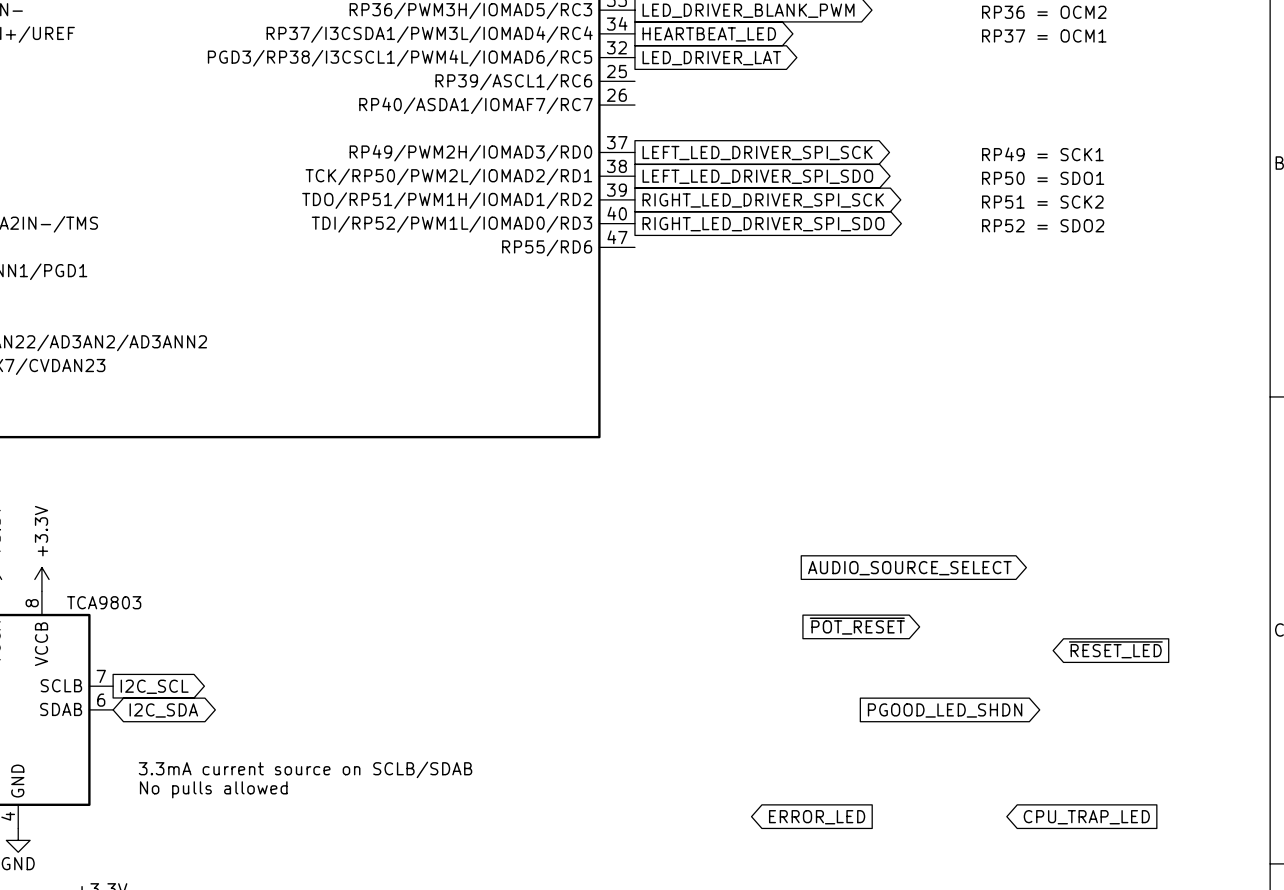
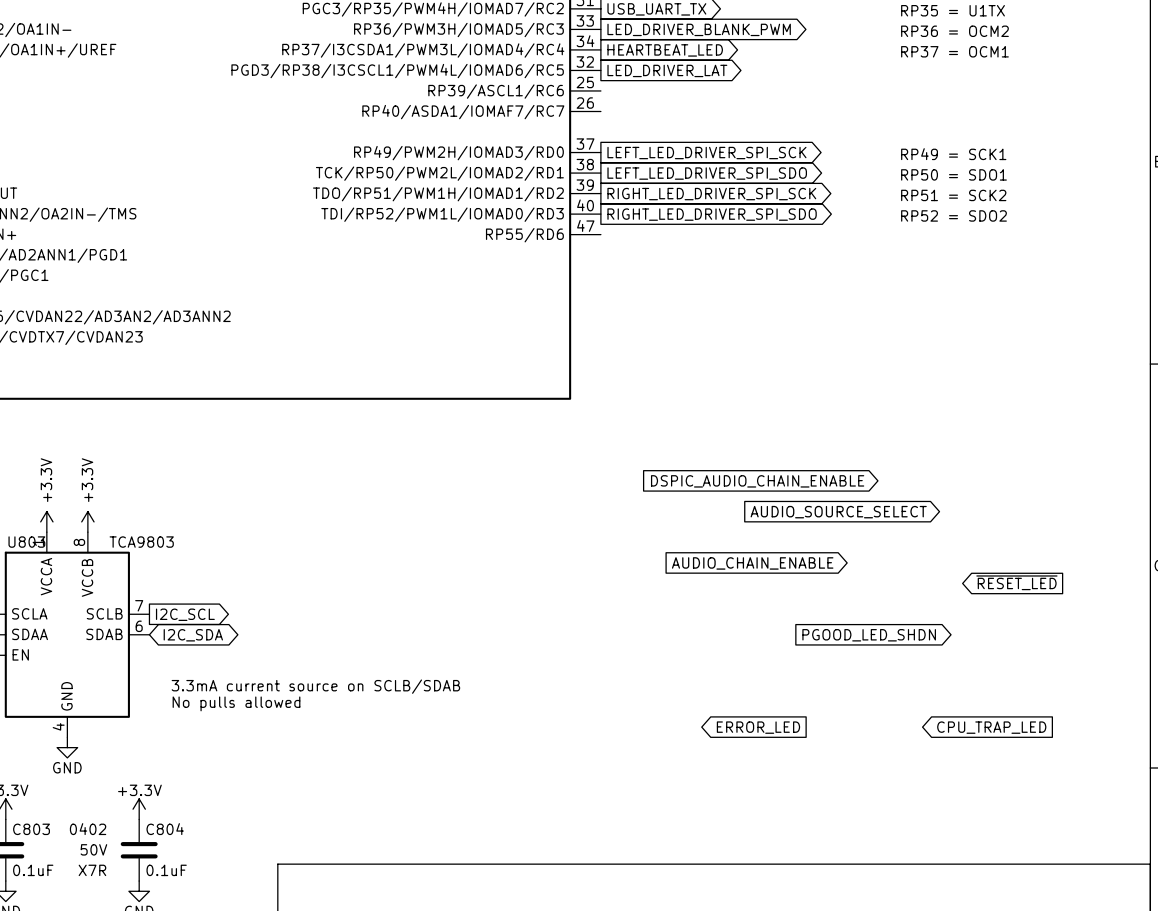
global label: none -> DSPIC_AUDIO_CHAIN_ENABLE (757, 481)
global label: ~{POT_RESET} (857, 626) -> AUDIO_CHAIN_ENABLE (752, 563)

